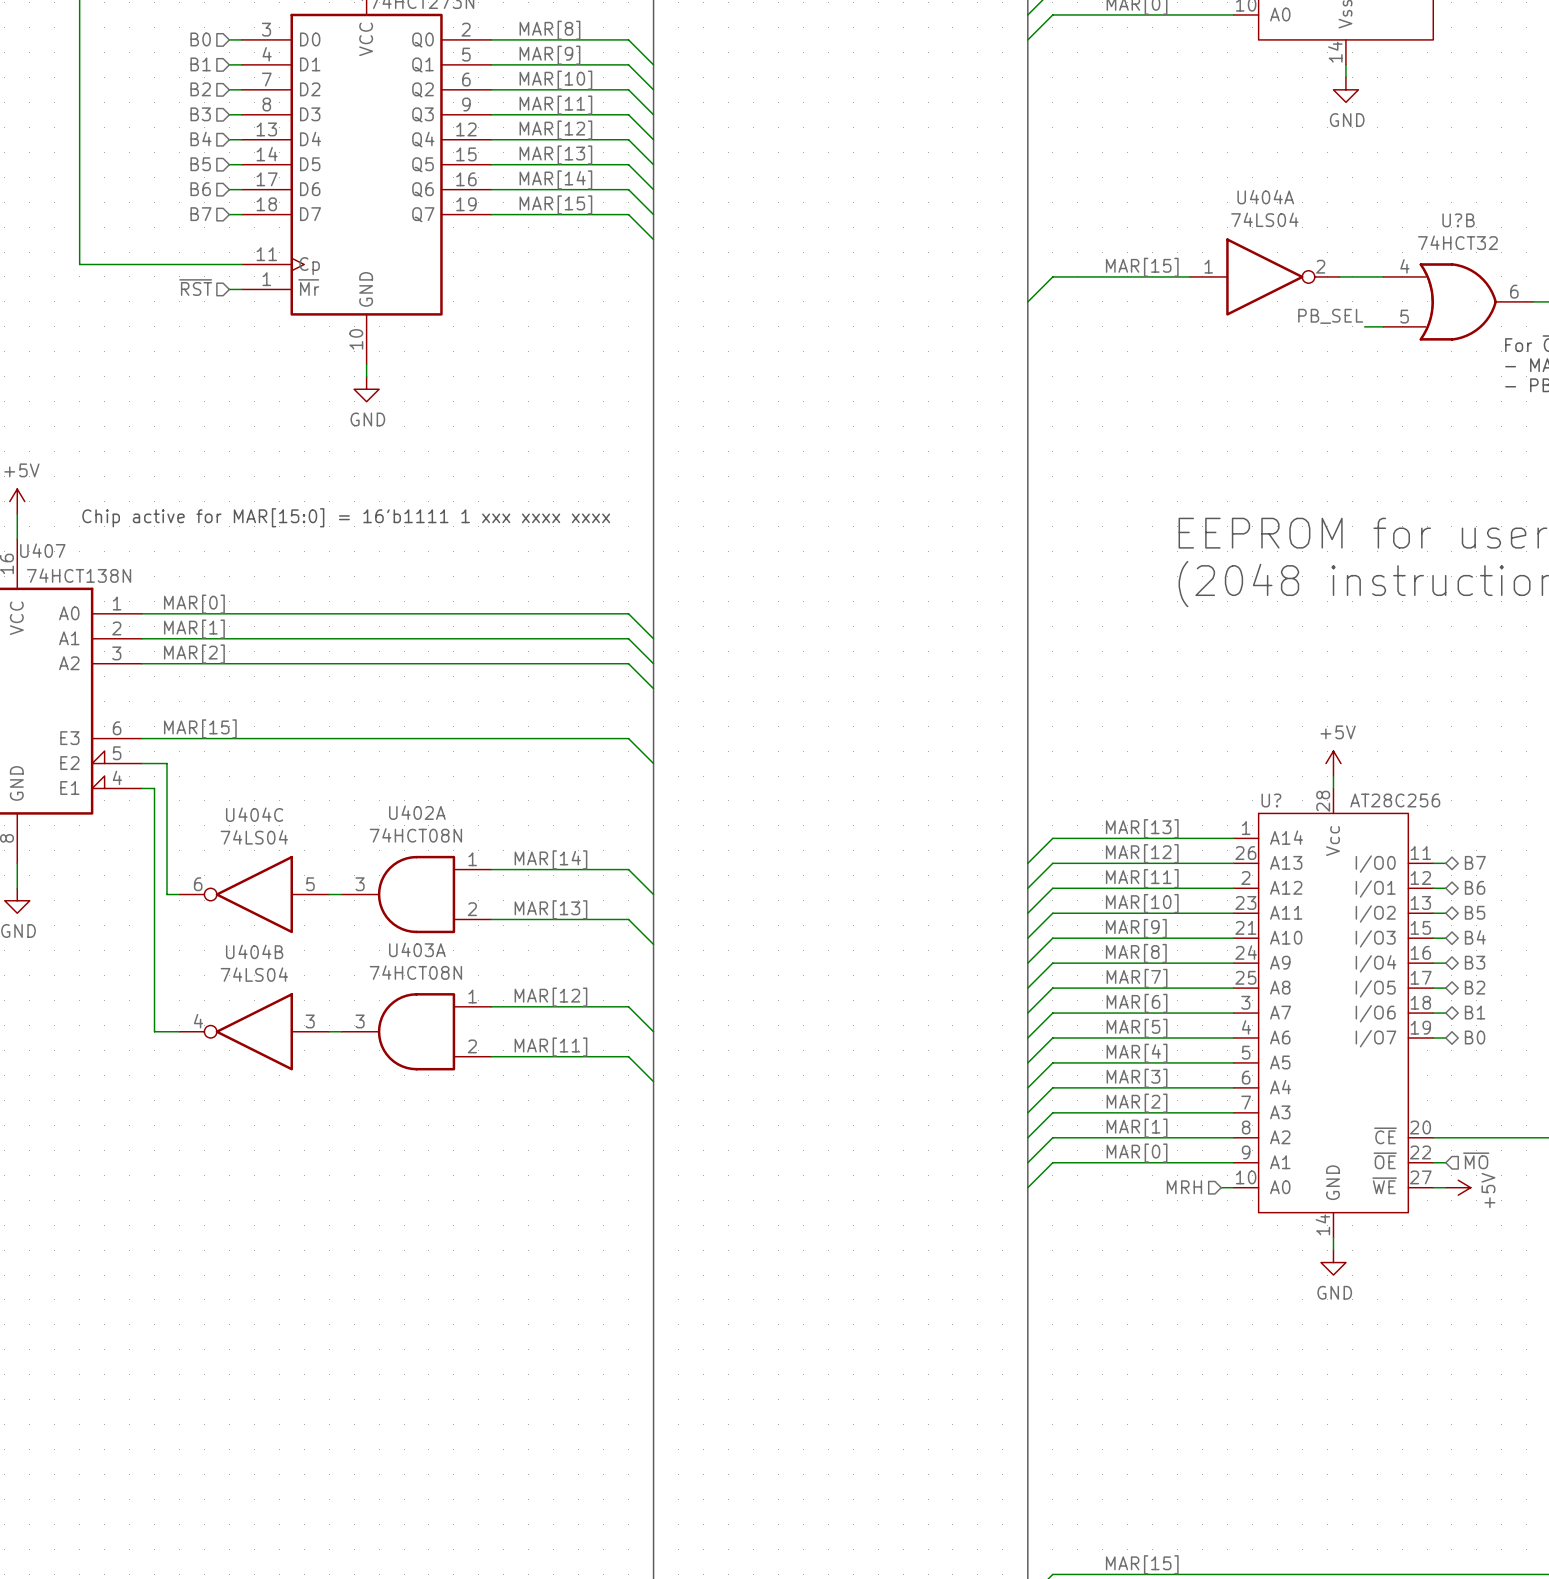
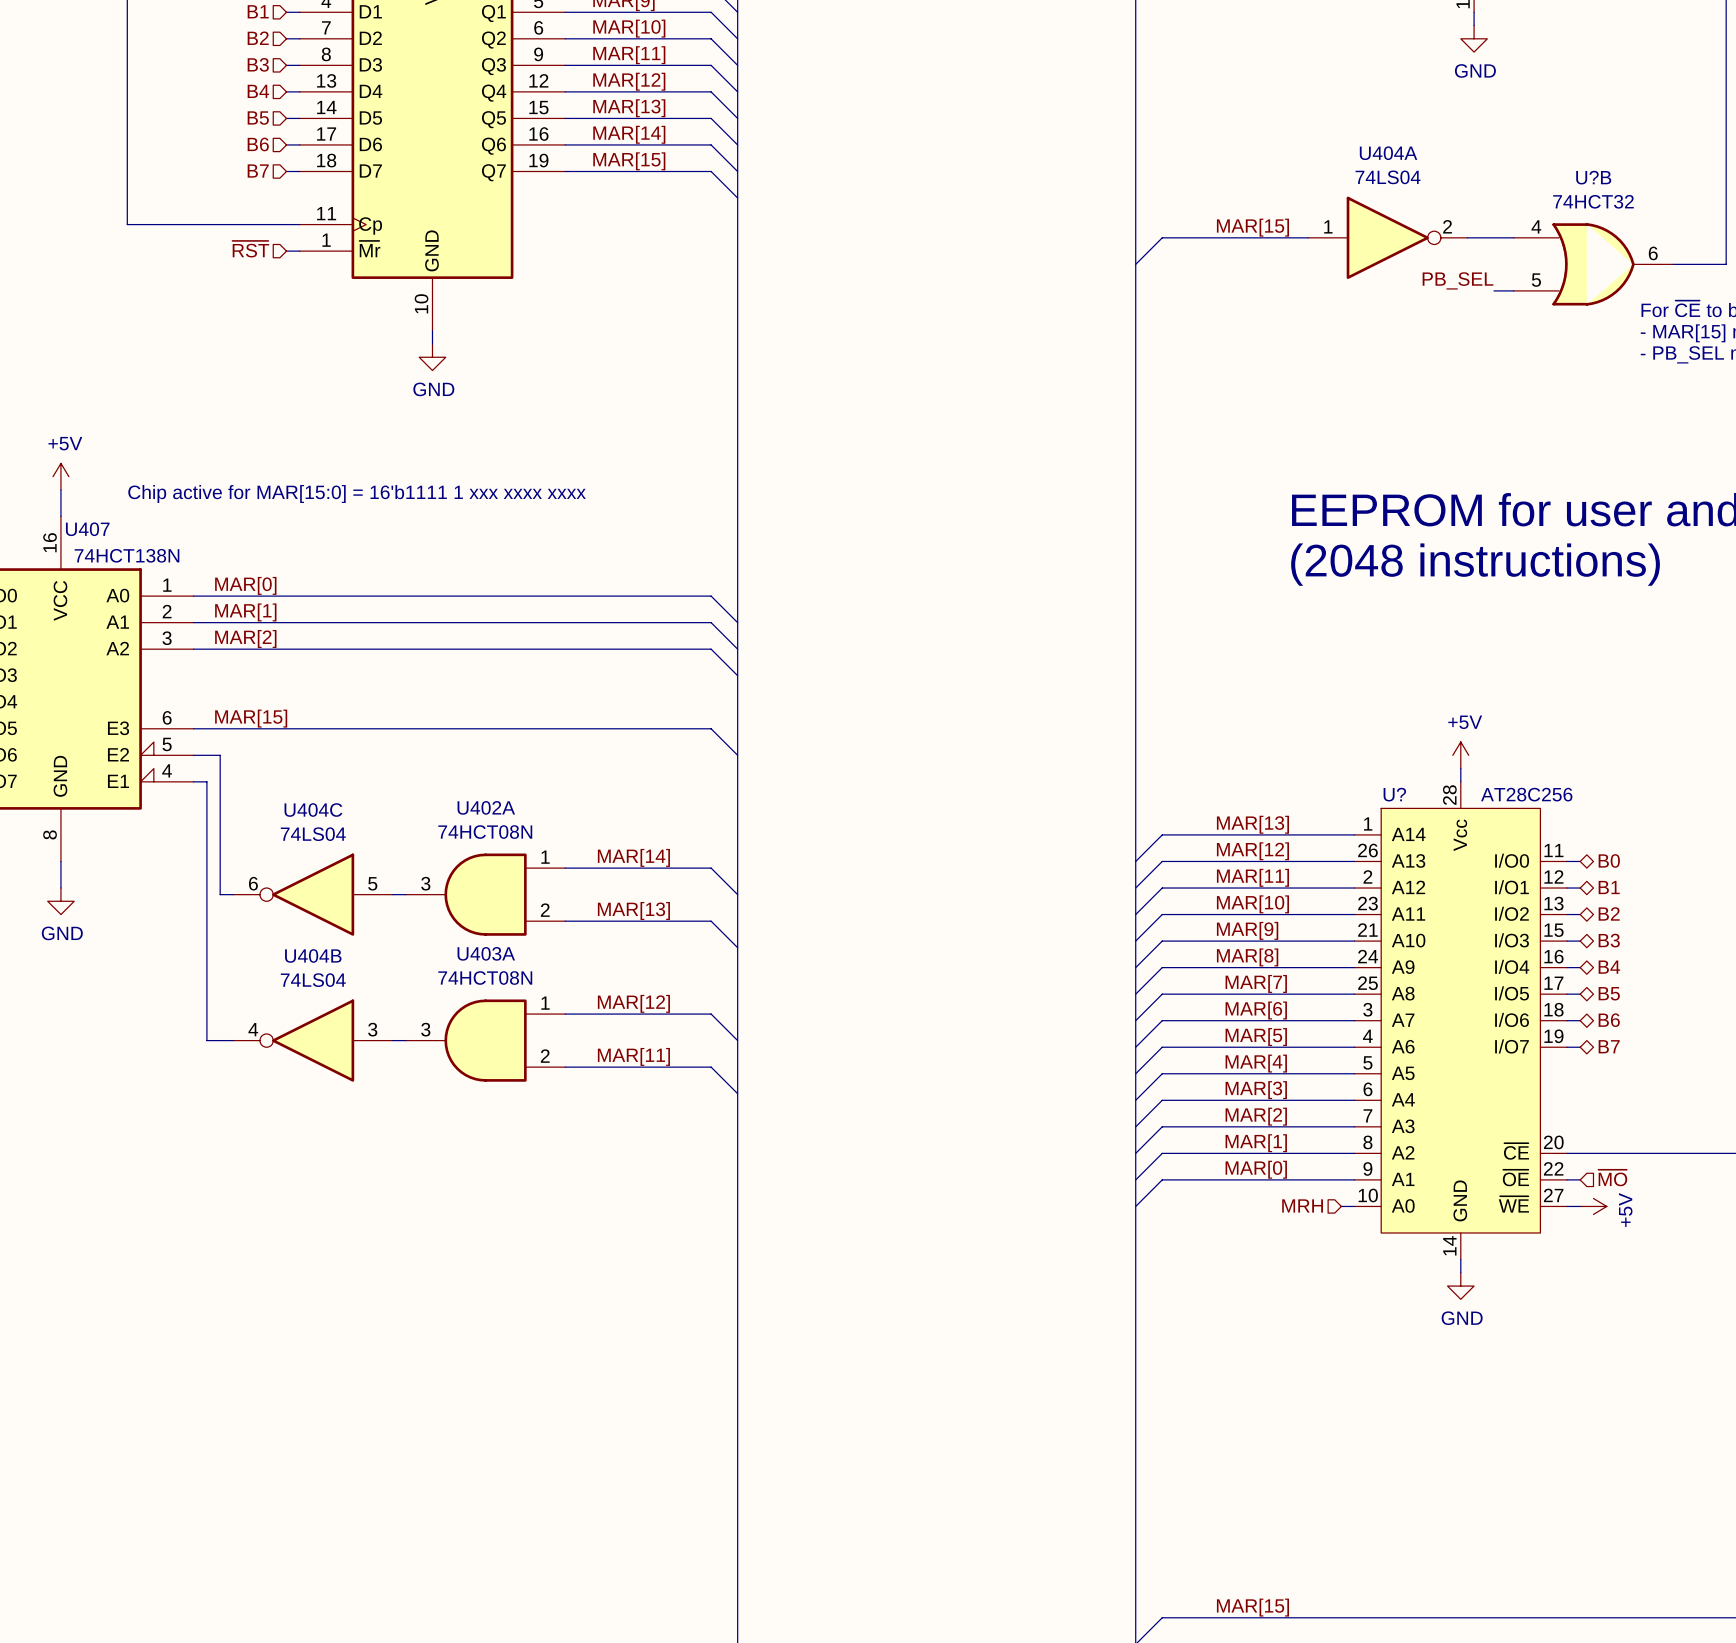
hierarchical label: B7 (1475, 862) -> B0 (1609, 860)
hierarchical label: B6 (1475, 887) -> B1 (1609, 887)
hierarchical label: B5 (1475, 912) -> B2 (1609, 913)
hierarchical label: B4 (1475, 937) -> B3 (1609, 940)
hierarchical label: B3 (1475, 962) -> B4 (1609, 967)
hierarchical label: B2 (1475, 987) -> B5 (1609, 993)
hierarchical label: B1 (1475, 1012) -> B6 (1609, 1020)
hierarchical label: B0 (1475, 1037) -> B7 (1609, 1046)

